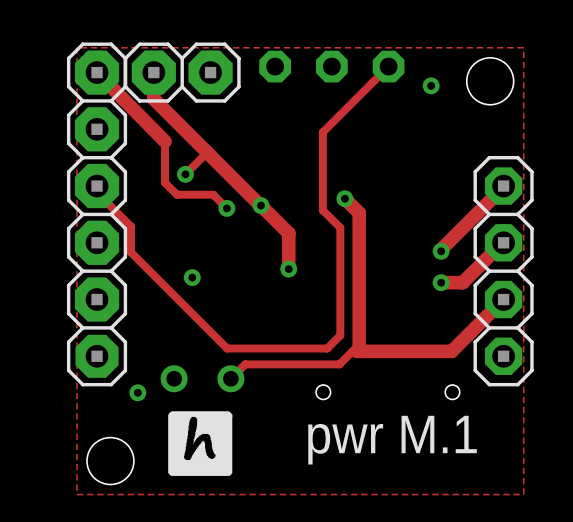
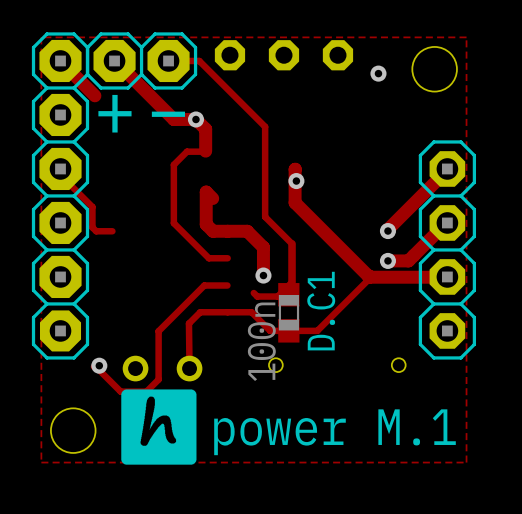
track: (388, 66) (322, 132) (322, 210) (340, 227) (340, 264) -> (168, 60) (199, 60) (265, 126) (265, 216) (292, 243)
track: (153, 72) (153, 99) (288, 233) (288, 269) -> (114, 60) (173, 119) (195, 119) (205, 129) (206, 151) (187, 151) (173, 164) (173, 223) (208, 258) (227, 258)
track: (133, 109) (165, 141) (165, 182) (176, 194) (213, 194) (226, 208) -> none
text: none -> + (114, 113)
text: none -> − (168, 114)
via: none -> (195, 119)
track: (207, 152) (185, 174) -> none
via: (185, 174) -> none
track: (97, 192) (130, 226) (130, 252) (227, 348) (327, 348) (340, 335) (340, 305) -> (60, 175) (92, 207) (92, 227) (96, 231) (112, 231)
track: (344, 198) (359, 213) (359, 351) (352, 351) (339, 364) (245, 364) (230, 378) -> none
via: (260, 205) -> none
via: (226, 208) -> none
track: none -> (212, 198) (206, 192) (206, 224) (213, 231) (247, 231) (263, 247) (263, 275)
via position: (288, 269) -> (263, 275)
via: (192, 277) -> none
track: none -> (368, 276) (369, 278) (317, 330) (270, 330) (251, 312) (200, 312) (188, 323) (189, 368)
track: (503, 299) (451, 351) (356, 351) -> (447, 277) (369, 277) (295, 202) (295, 169)
track: none -> (292, 282) (277, 296) (257, 296) (253, 293)
track: none -> (227, 285) (204, 285) (158, 331) (158, 379) (146, 391) (120, 391) (93, 366)
D.C1: none -> 100n (288, 312)
part position: (202, 378) -> (162, 368)
drawing: [168, 411, 233, 476] -> none
drawing: none -> [121, 389, 197, 465]
text: pwr M.1 (392, 440) -> power M.1 (335, 432)

